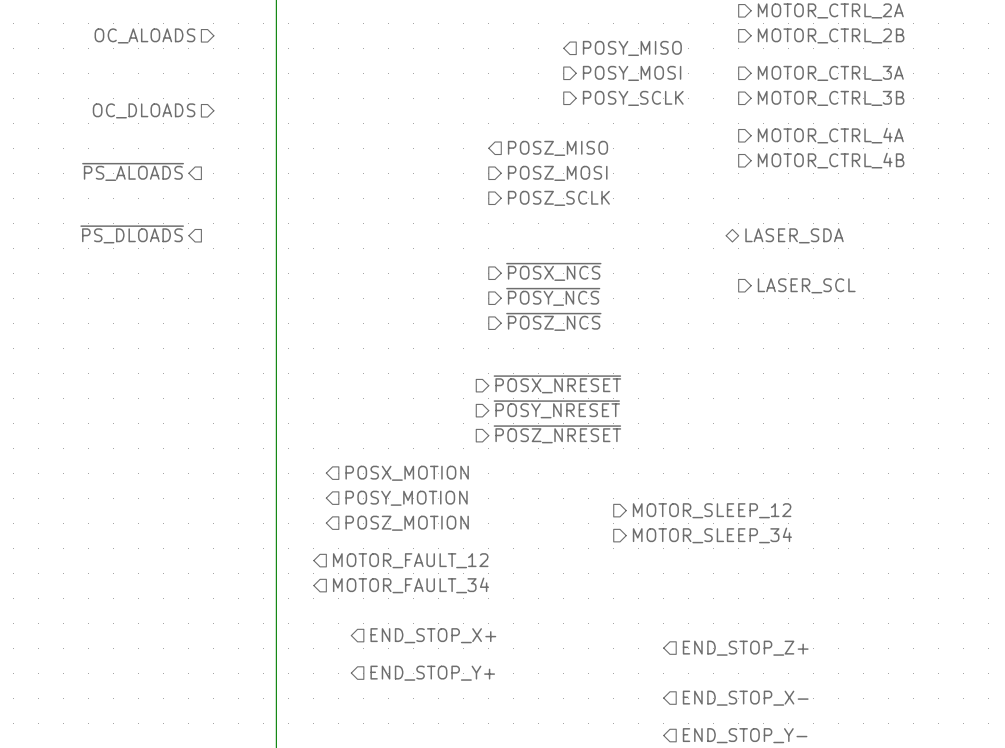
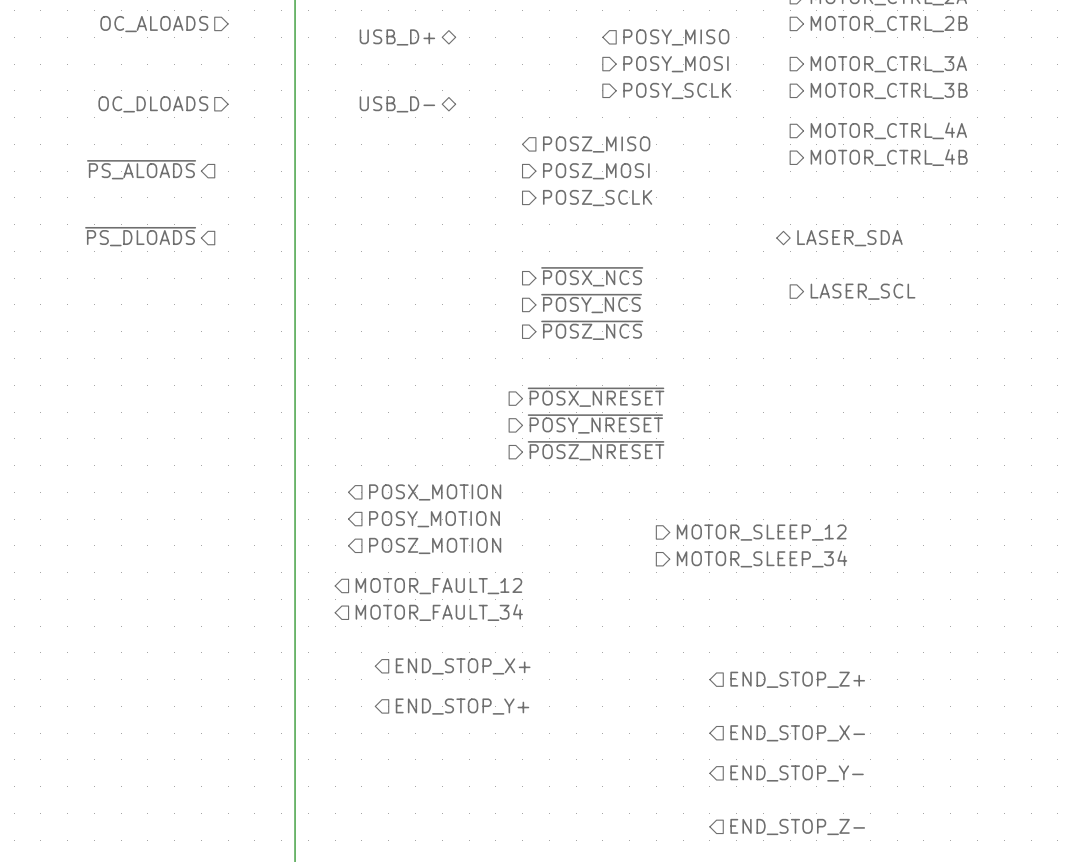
hierarchical label: none -> USB_D+ (397, 37)
hierarchical label: none -> USB_D- (397, 104)

